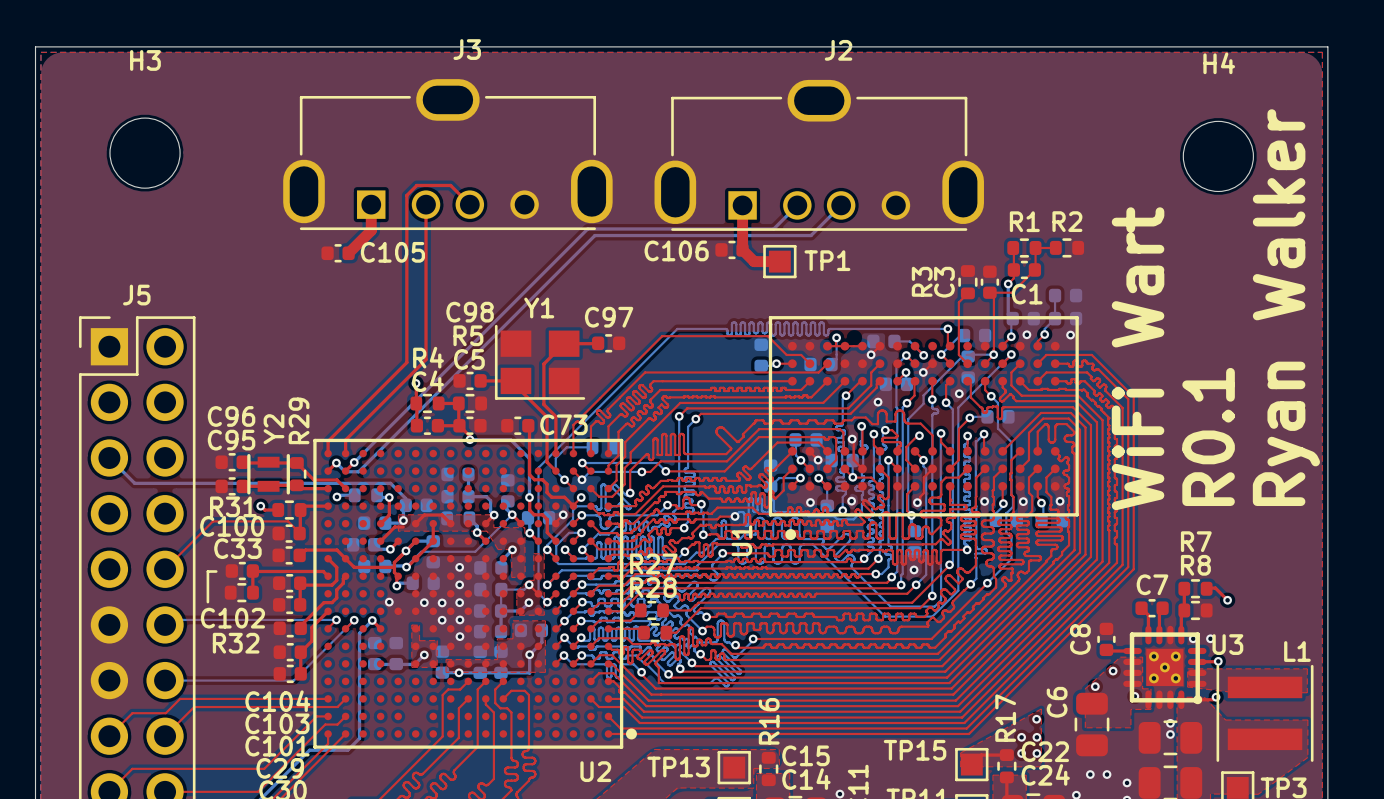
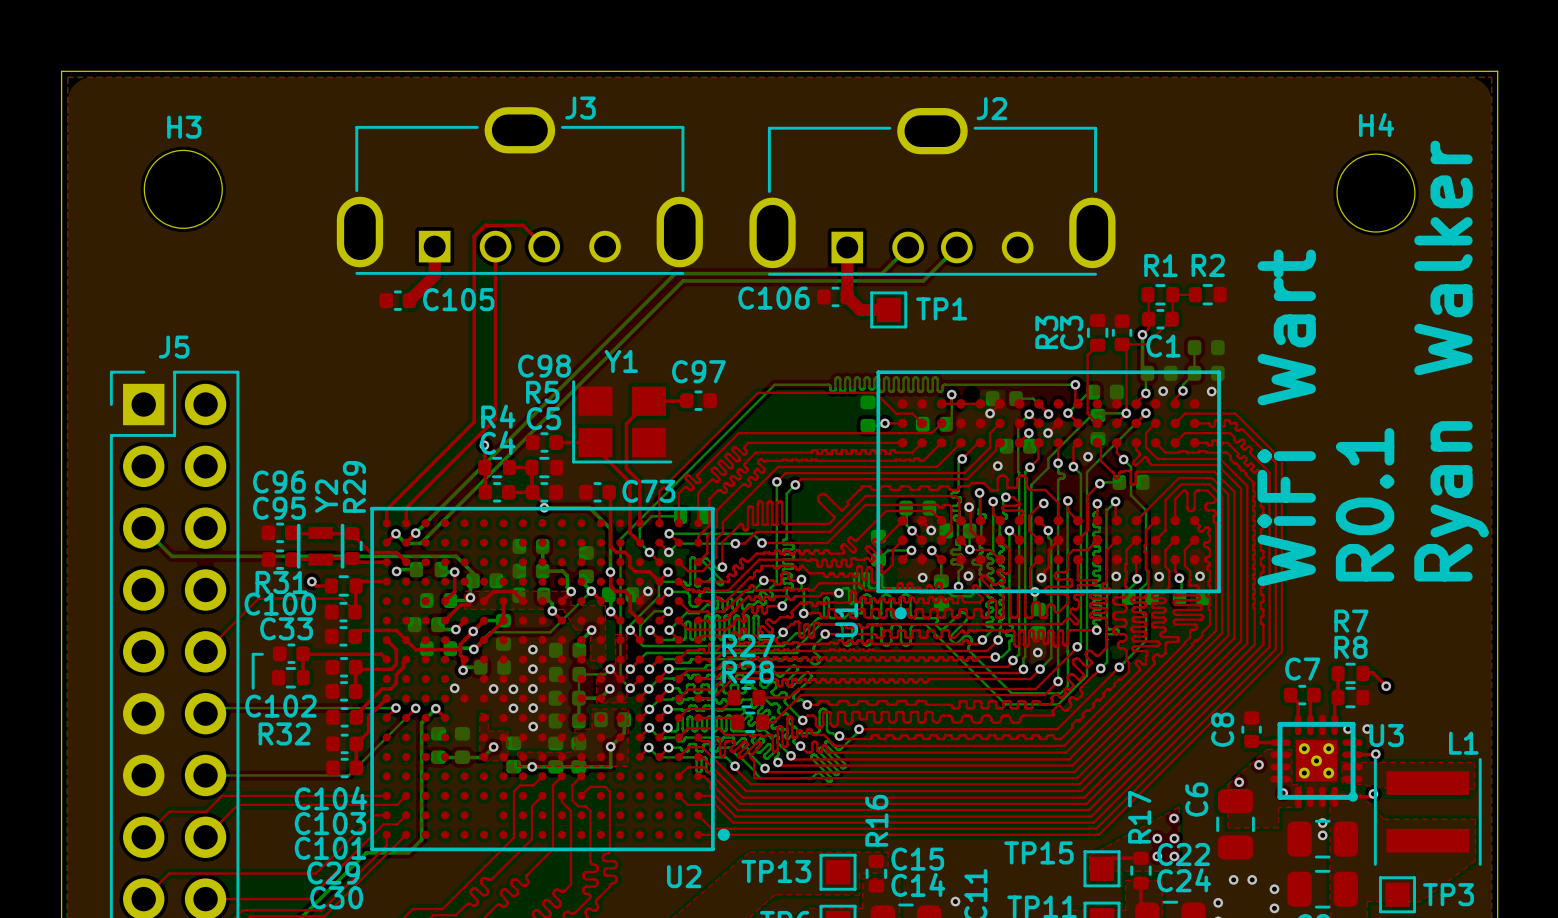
J3 name position: J3 (467, 49) -> J3 (580, 108)
J2 name position: J2 (838, 50) -> J2 (991, 108)
H3 name position: H3 (145, 60) -> H3 (184, 127)
H4 name position: H4 (1219, 63) -> H4 (1376, 125)

